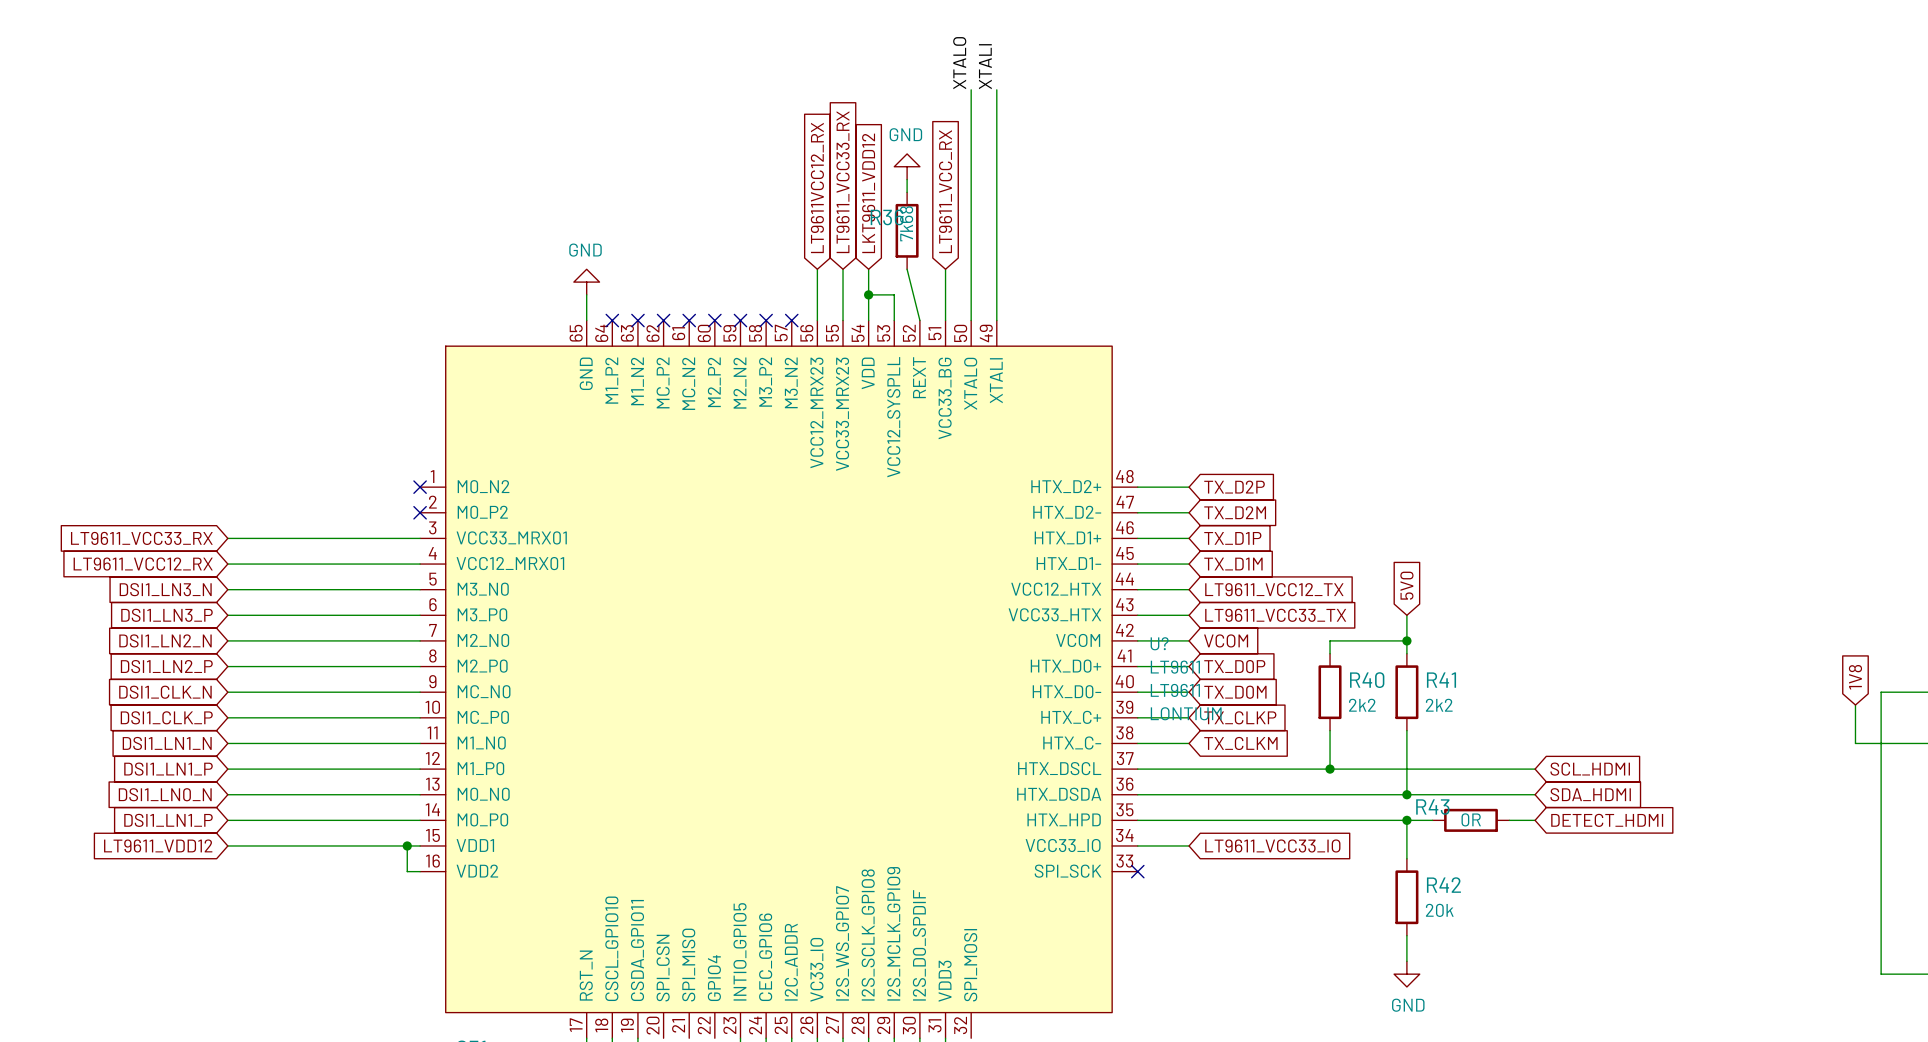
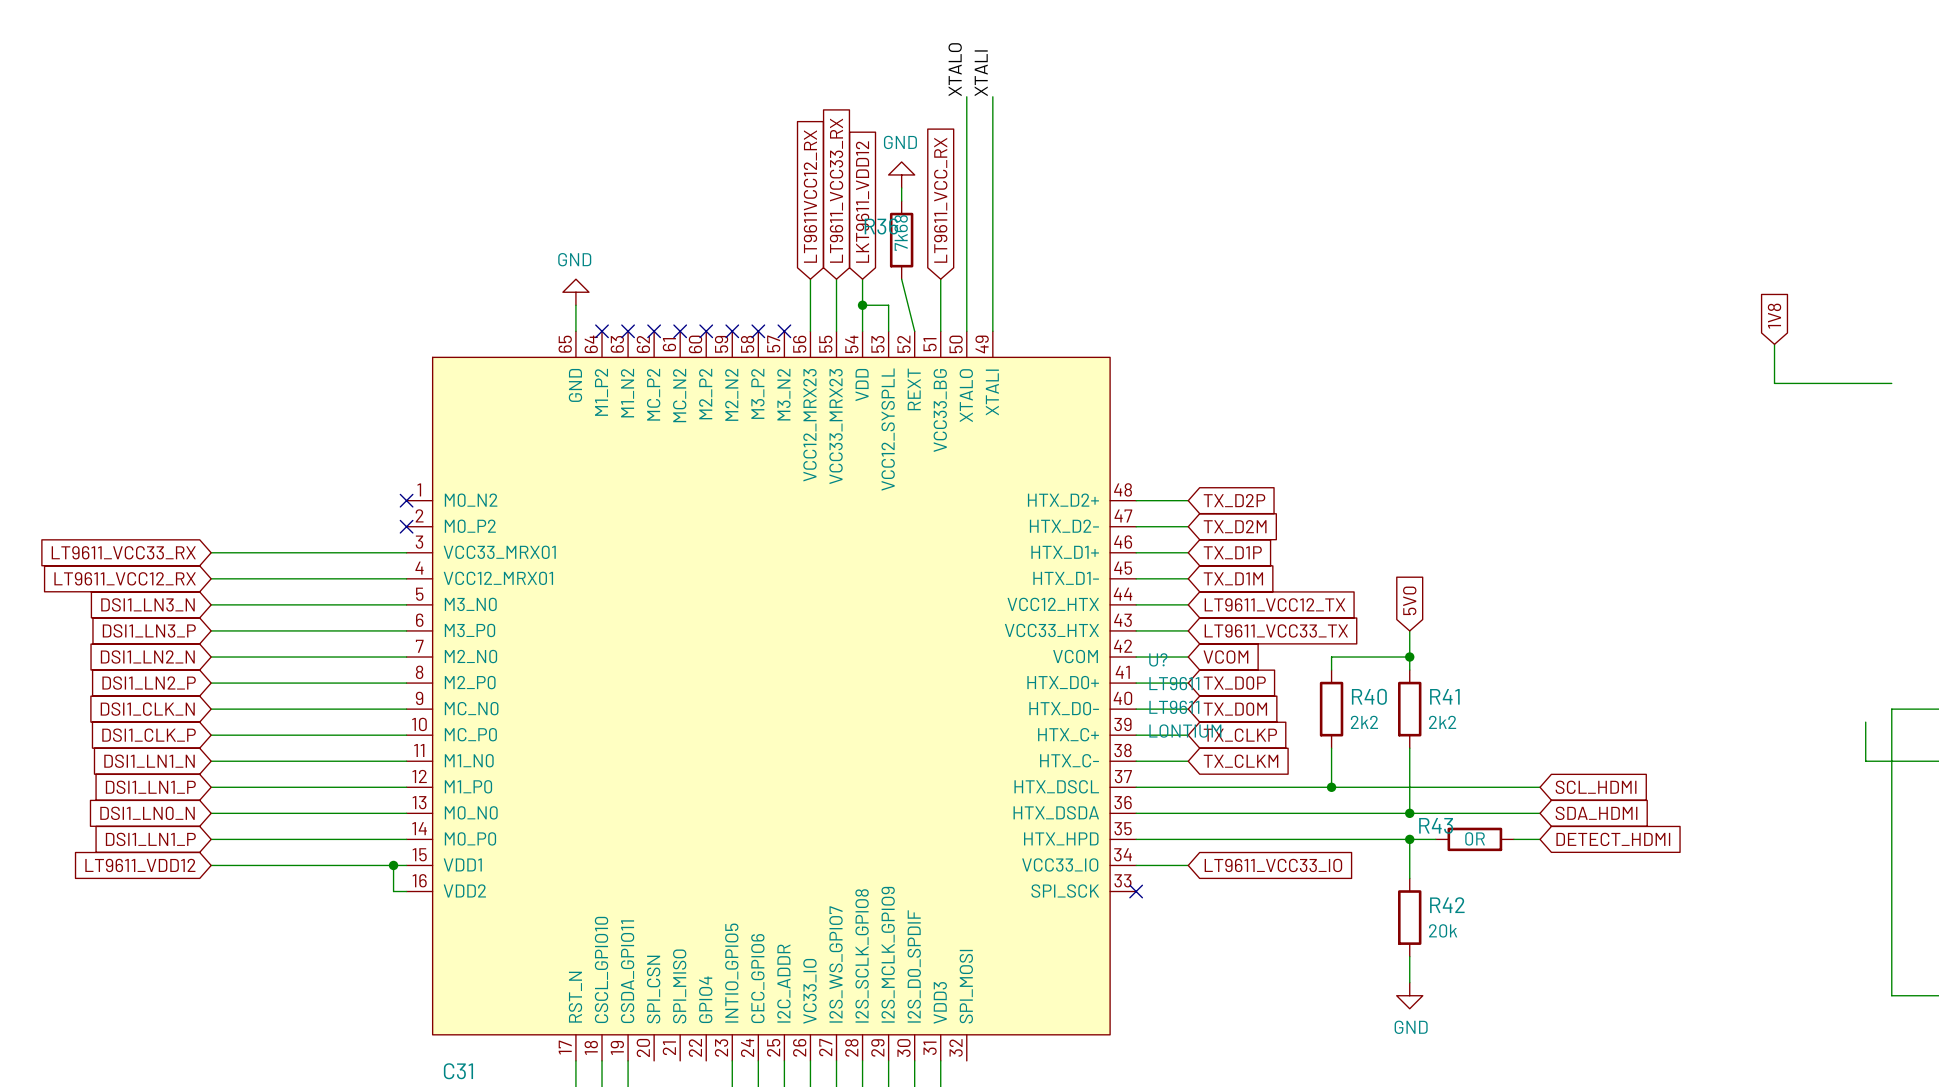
global label: none -> 1V8 (1774, 316)
wire: none -> (1774, 344) (1774, 383) (1891, 383)
global label: 1V8 (1855, 677) -> none

